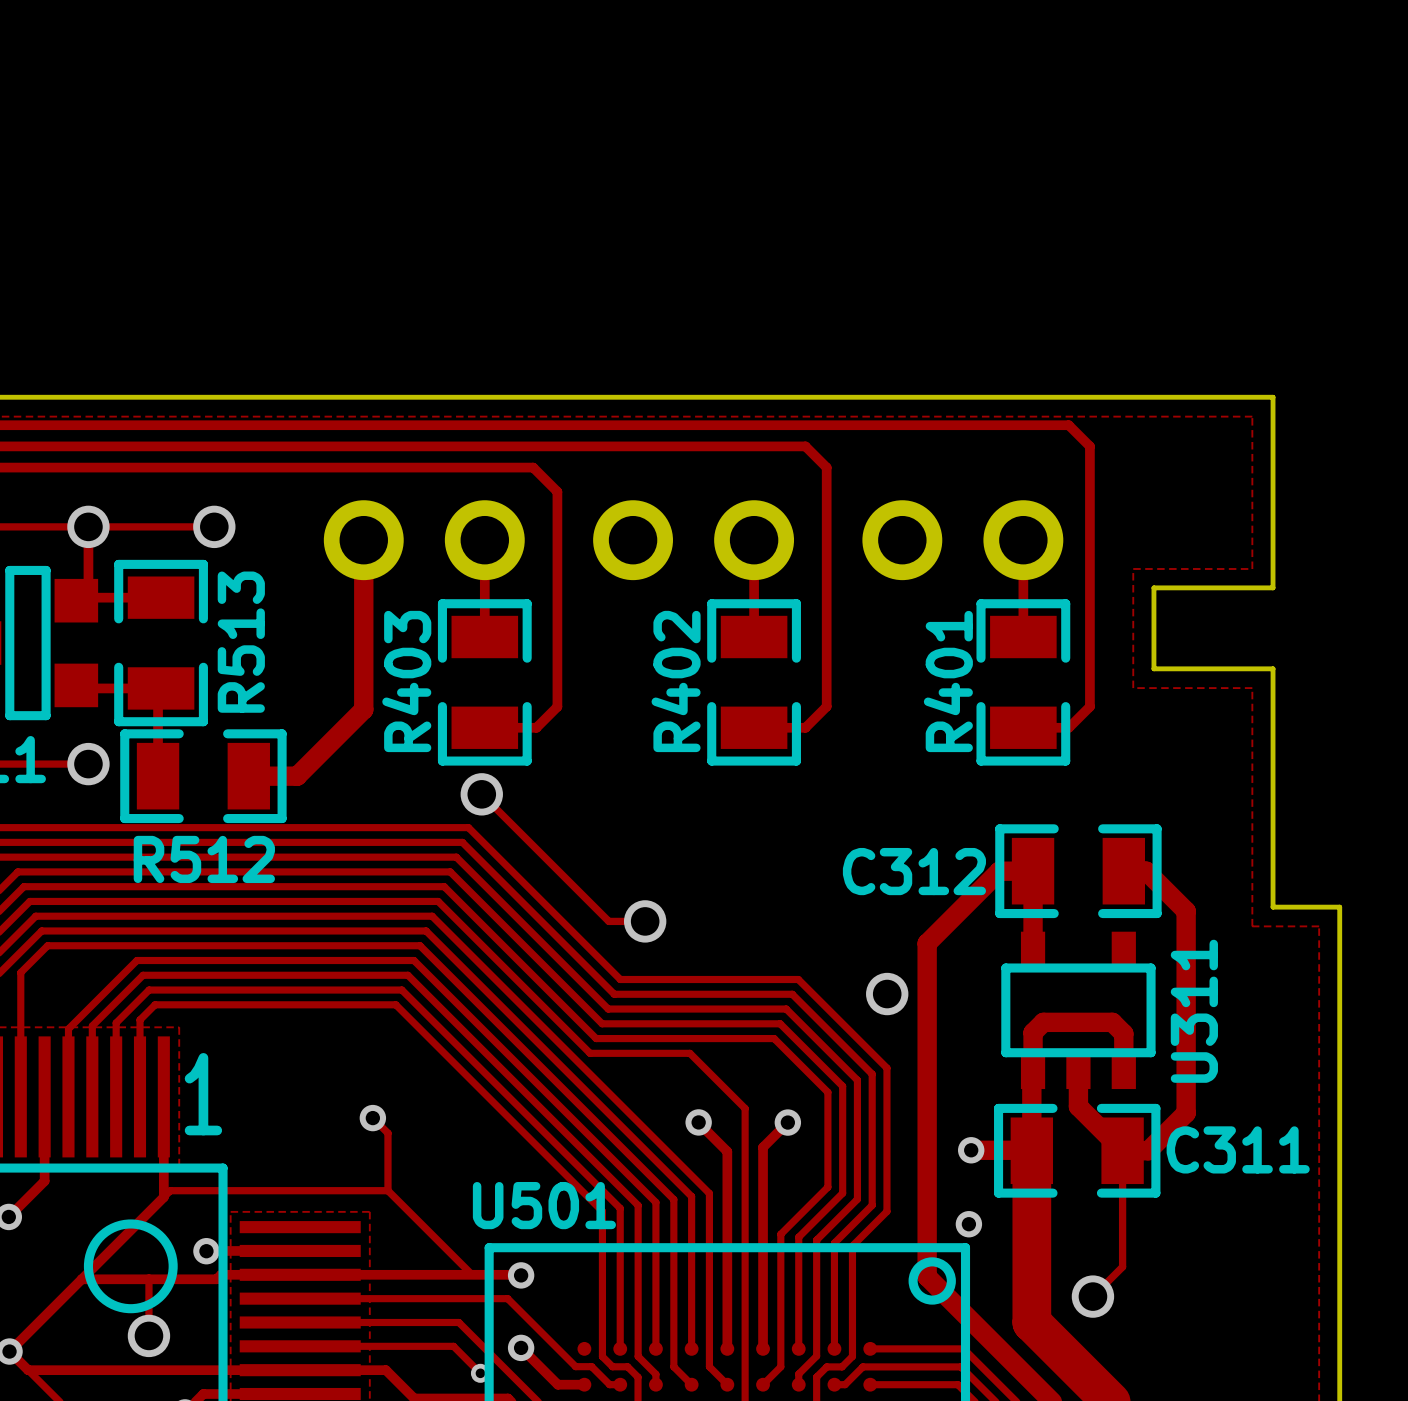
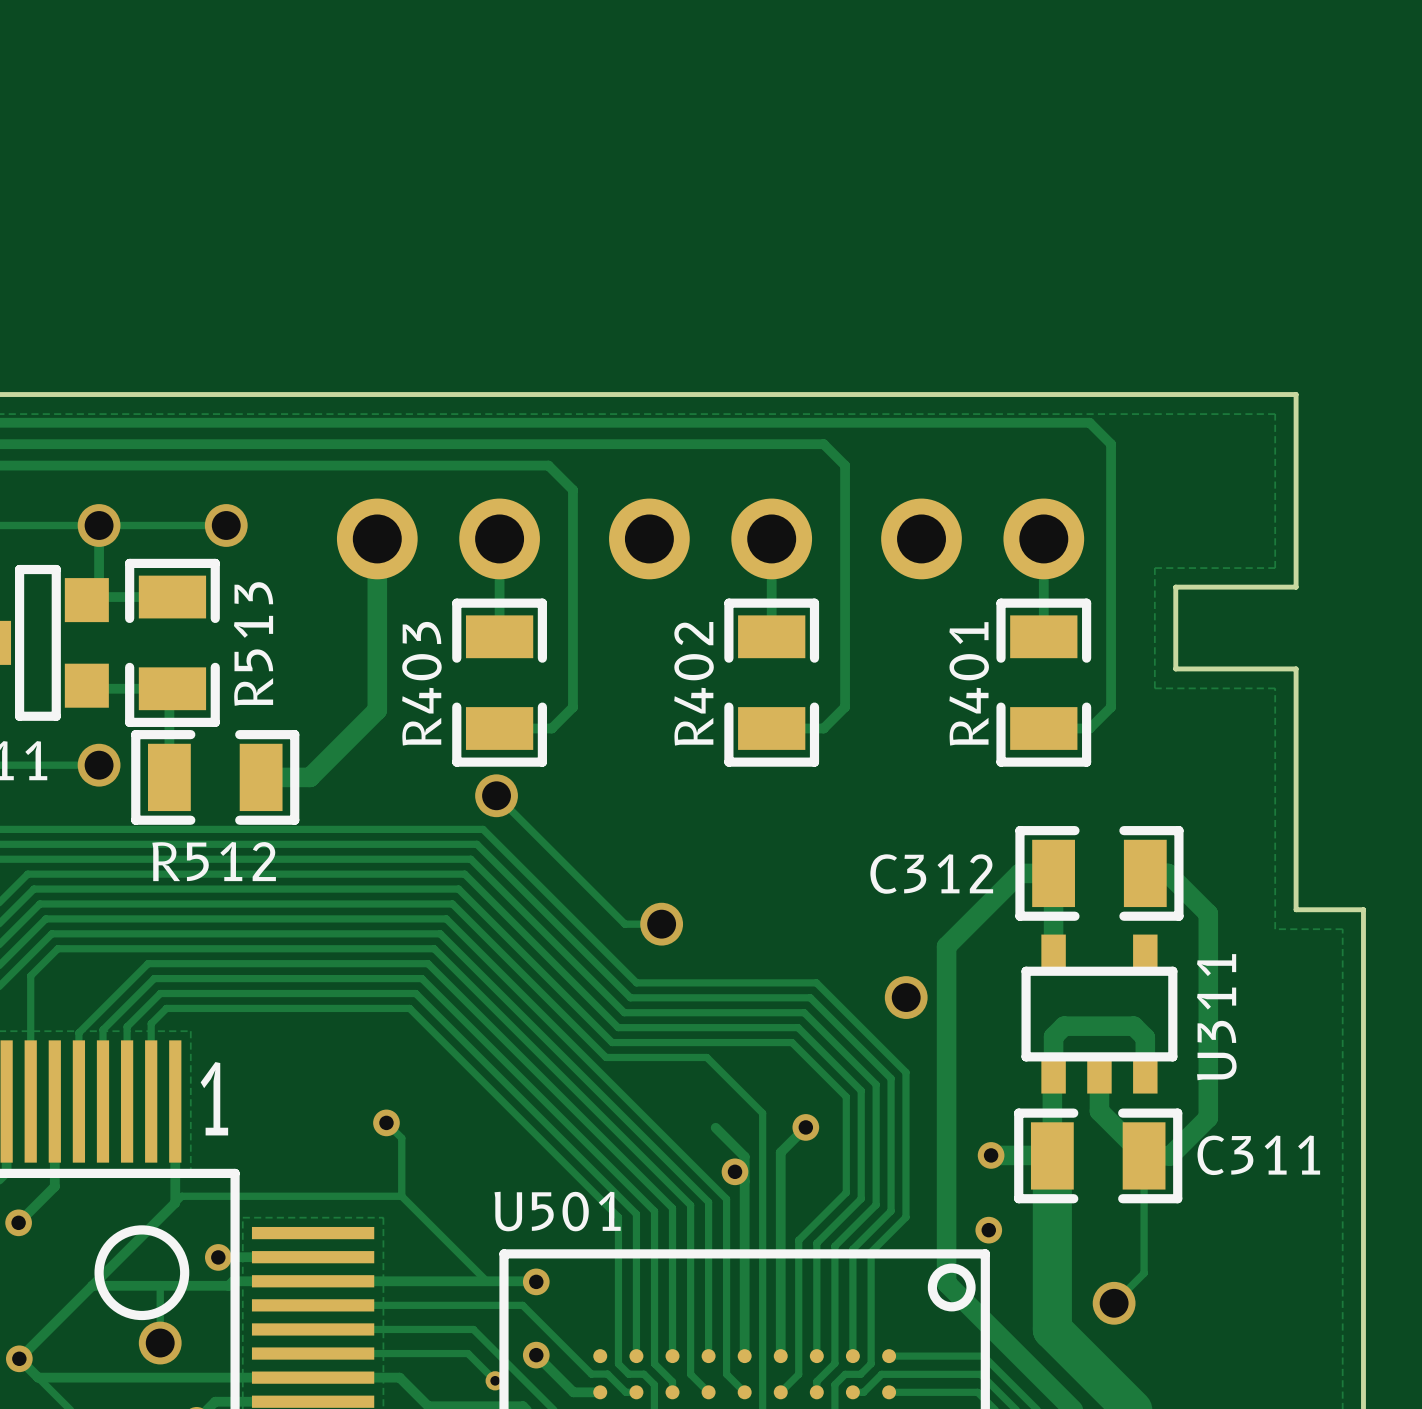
via position: (698, 1122) -> (735, 1171)

